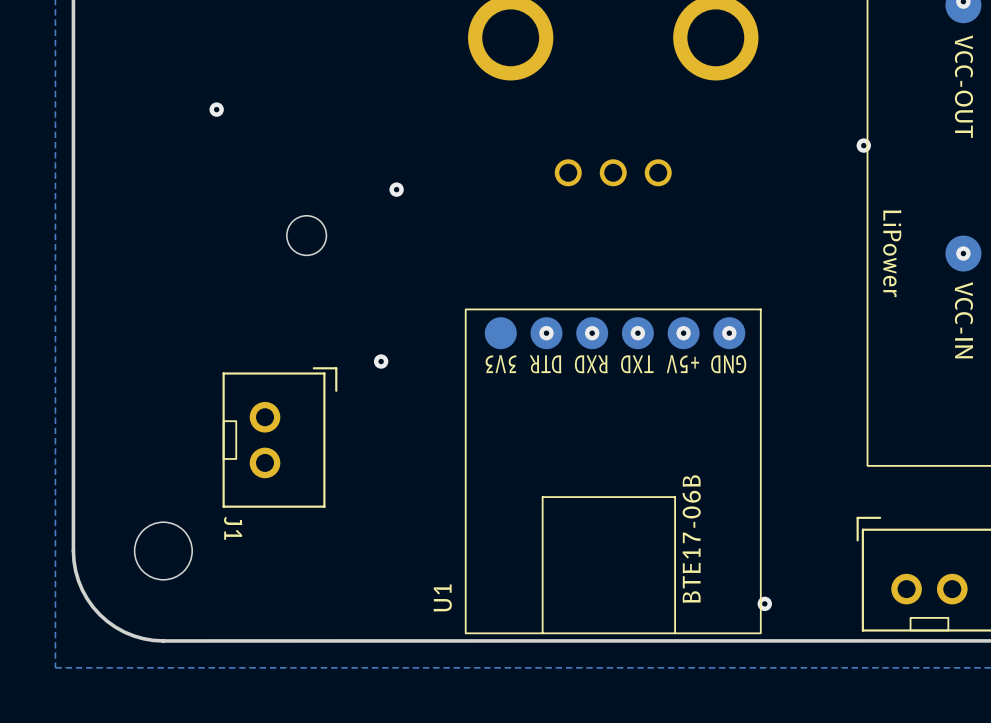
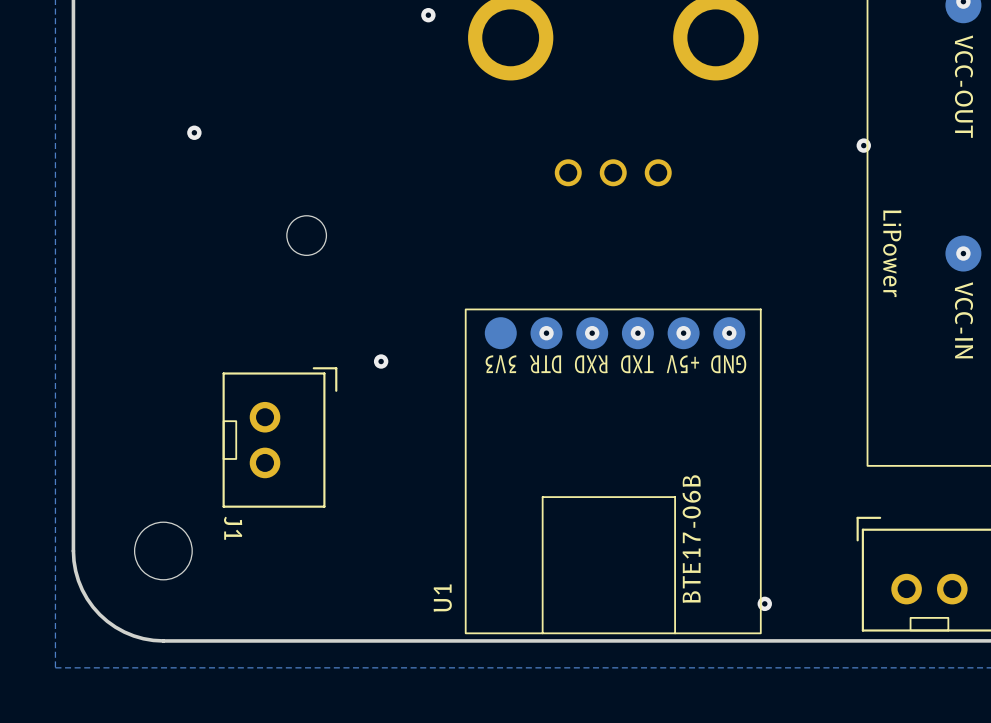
via: none -> (428, 15)
via position: (216, 109) -> (194, 132)
via: (396, 189) -> none

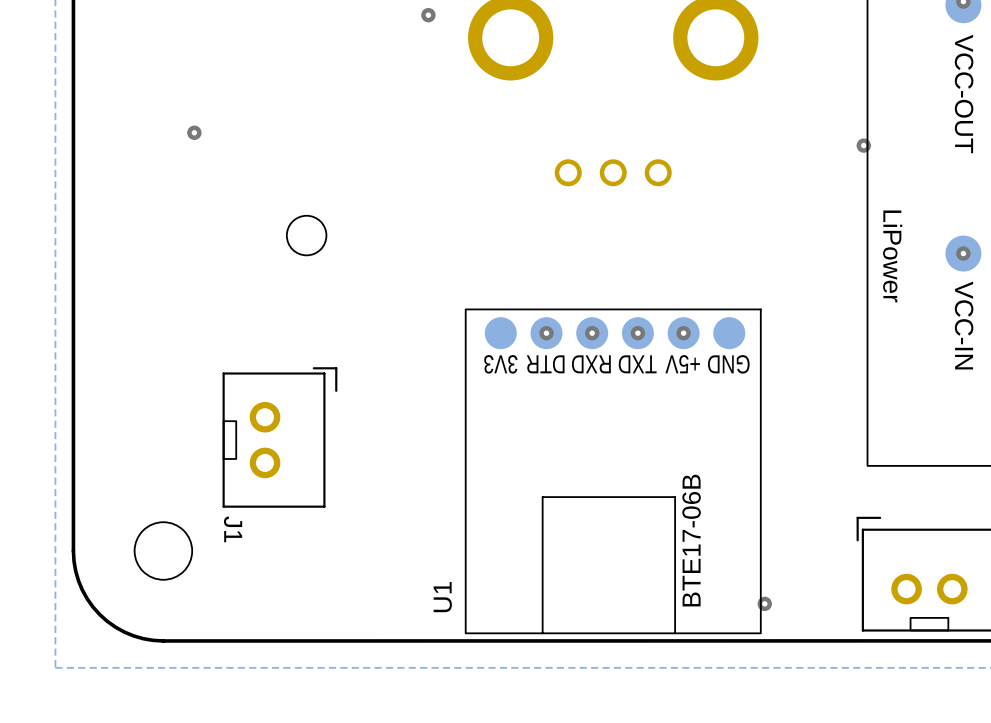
via: (729, 333) -> none
via: (381, 361) -> none

